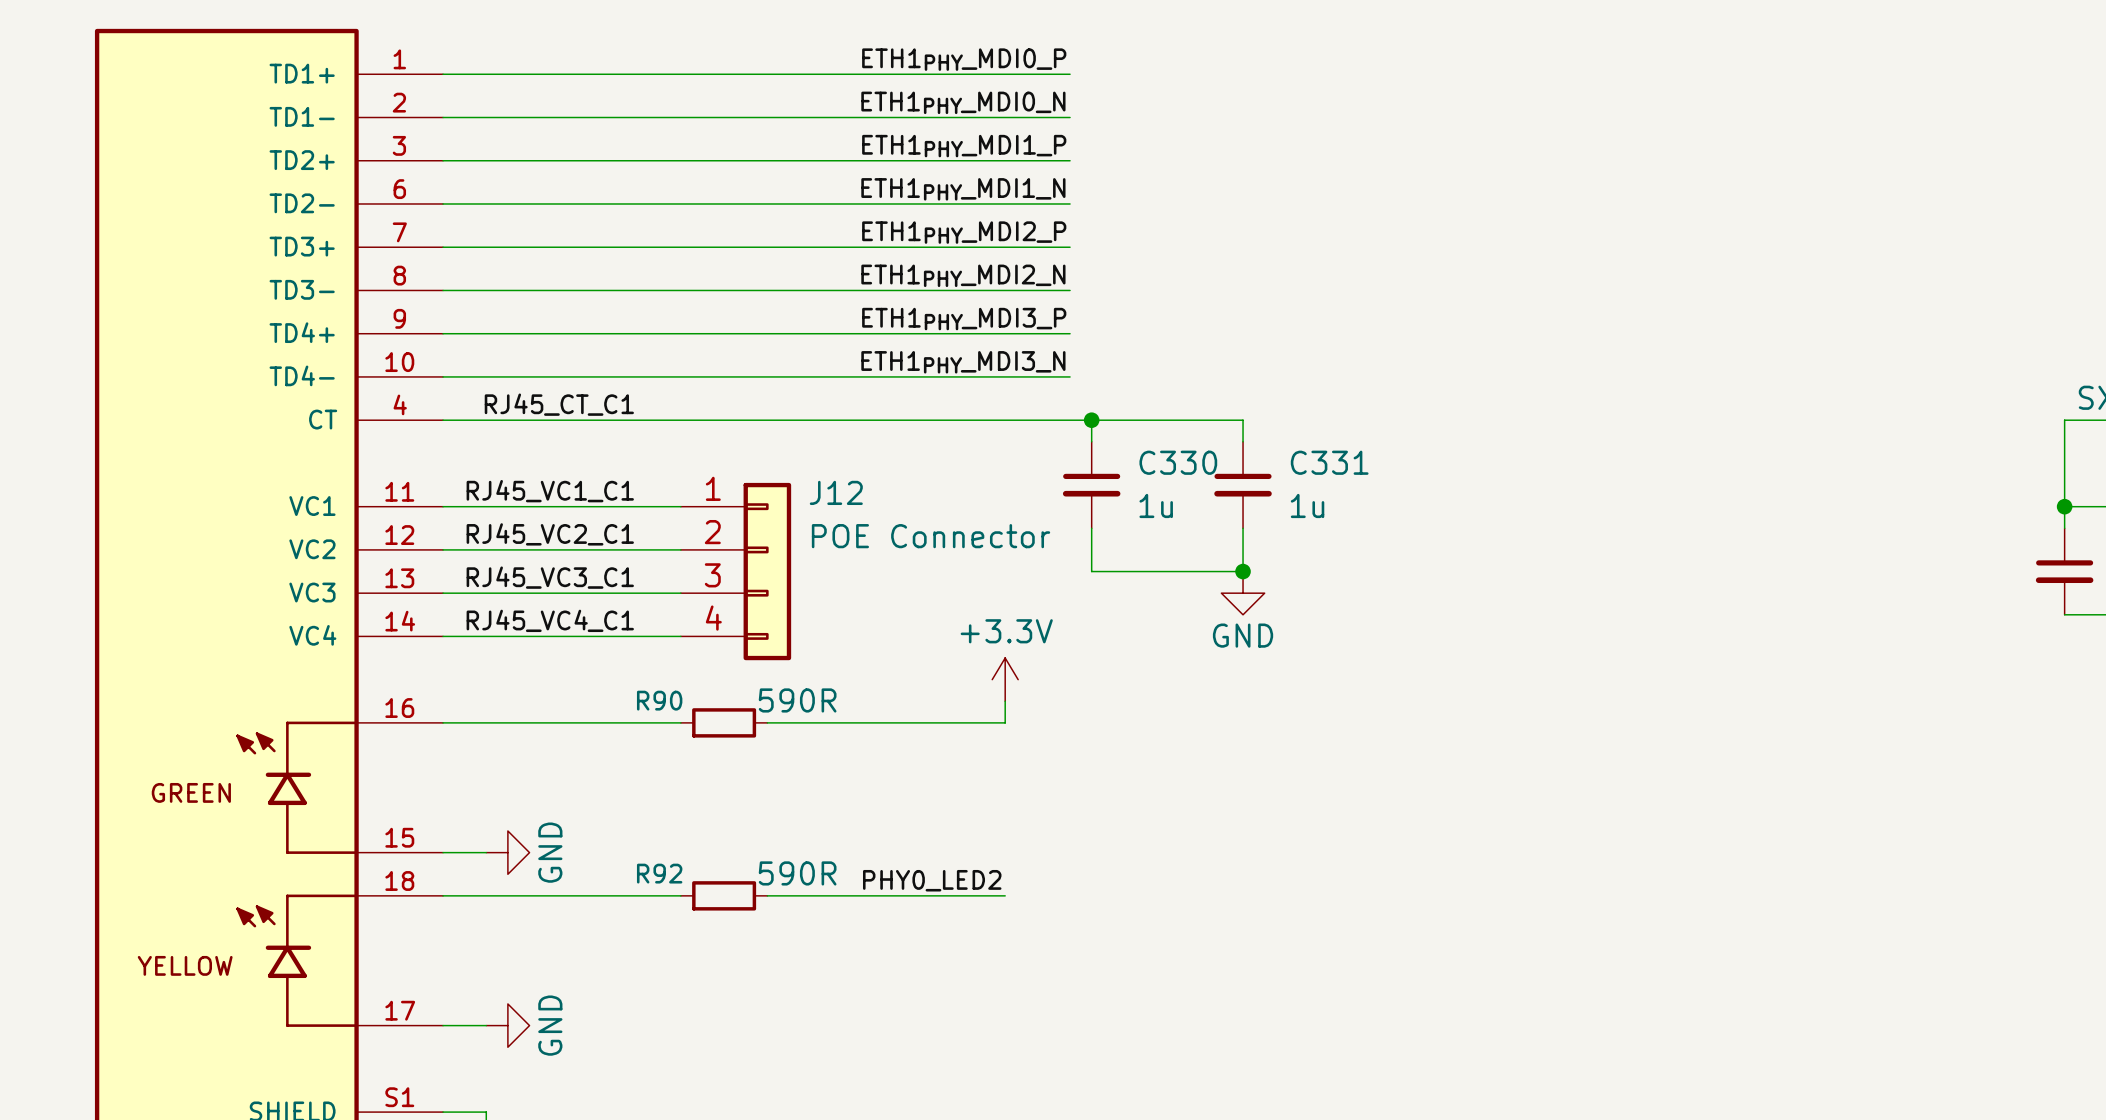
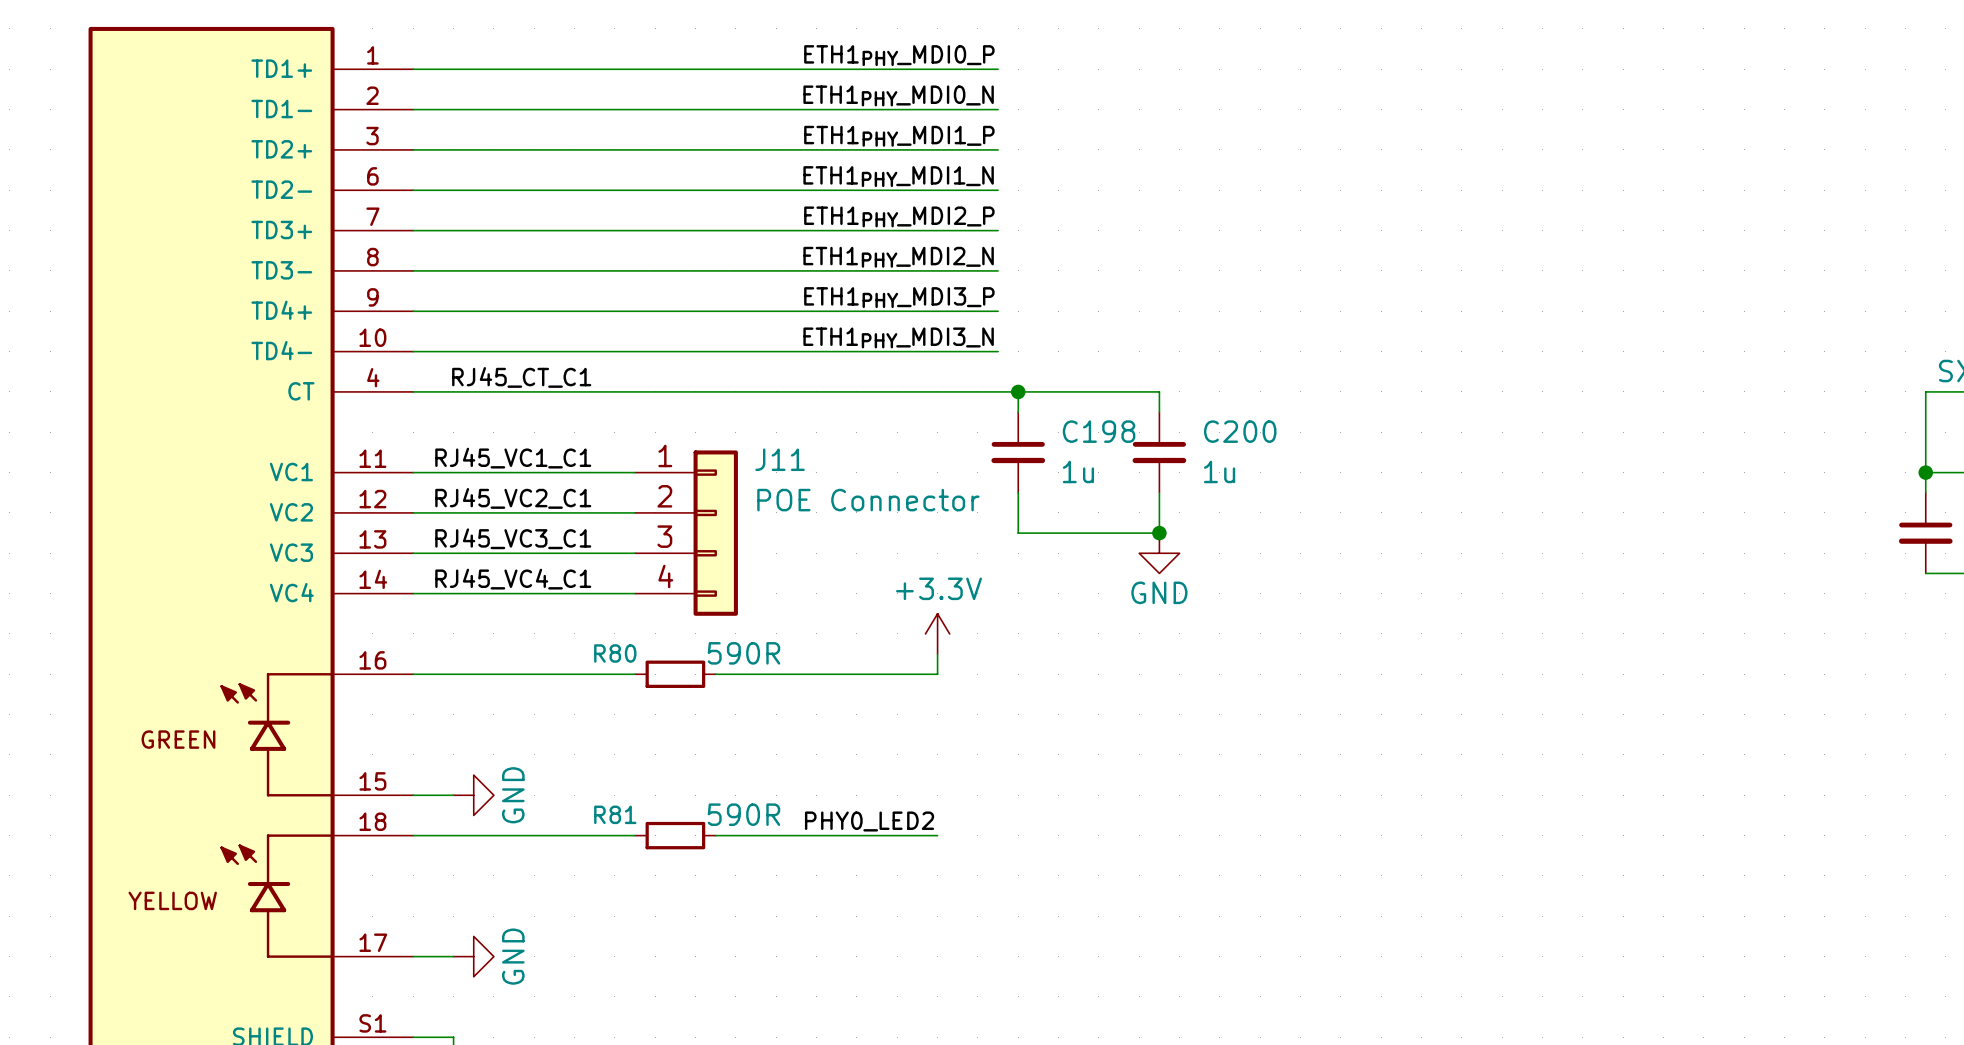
C330 name: C330 (1178, 462) -> C198 (1099, 431)
C331 name: C331 (1329, 462) -> C200 (1240, 431)
J12 name: J12 (836, 492) -> J11 (780, 459)
R90 name: R90 (659, 700) -> R80 (615, 653)
R92 name: R92 (659, 873) -> R81 (615, 814)

